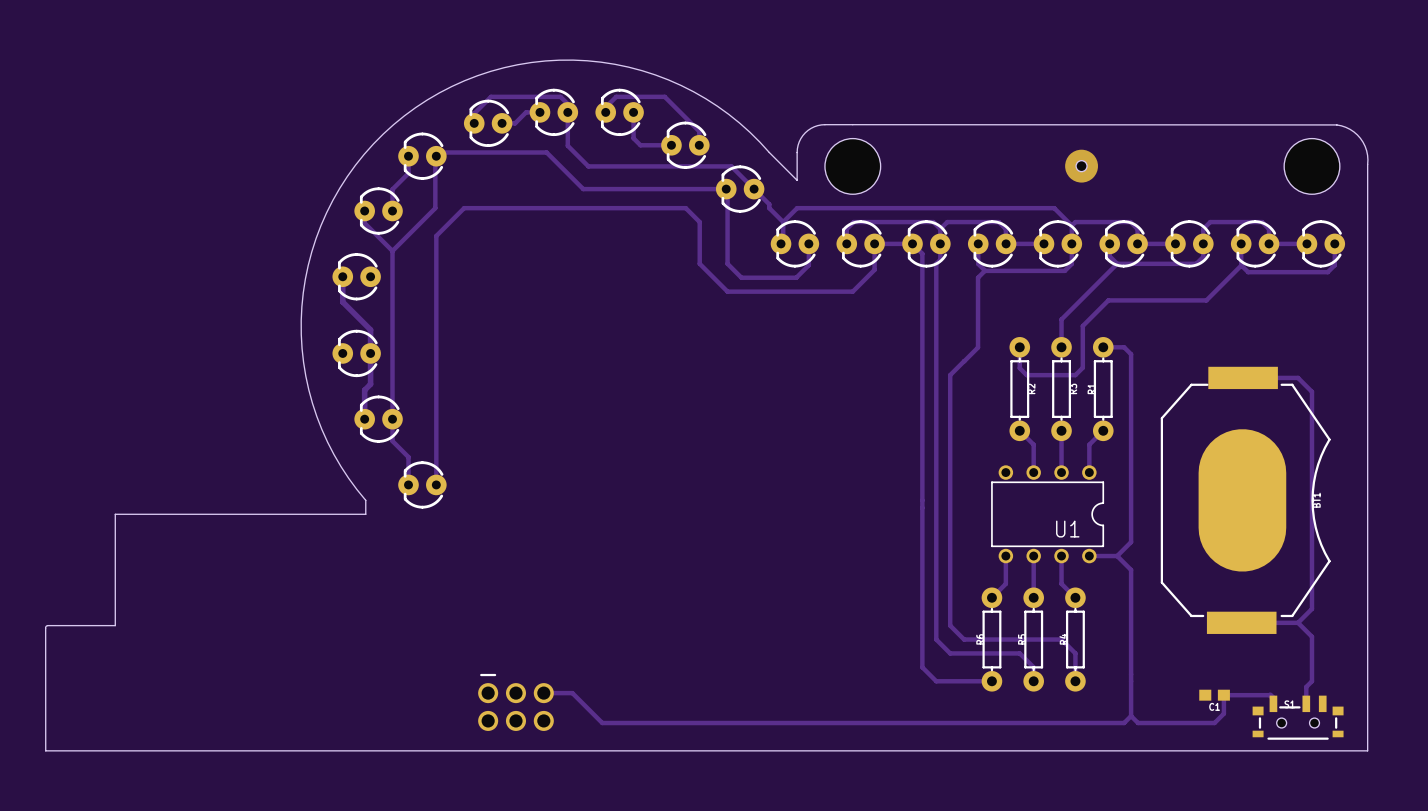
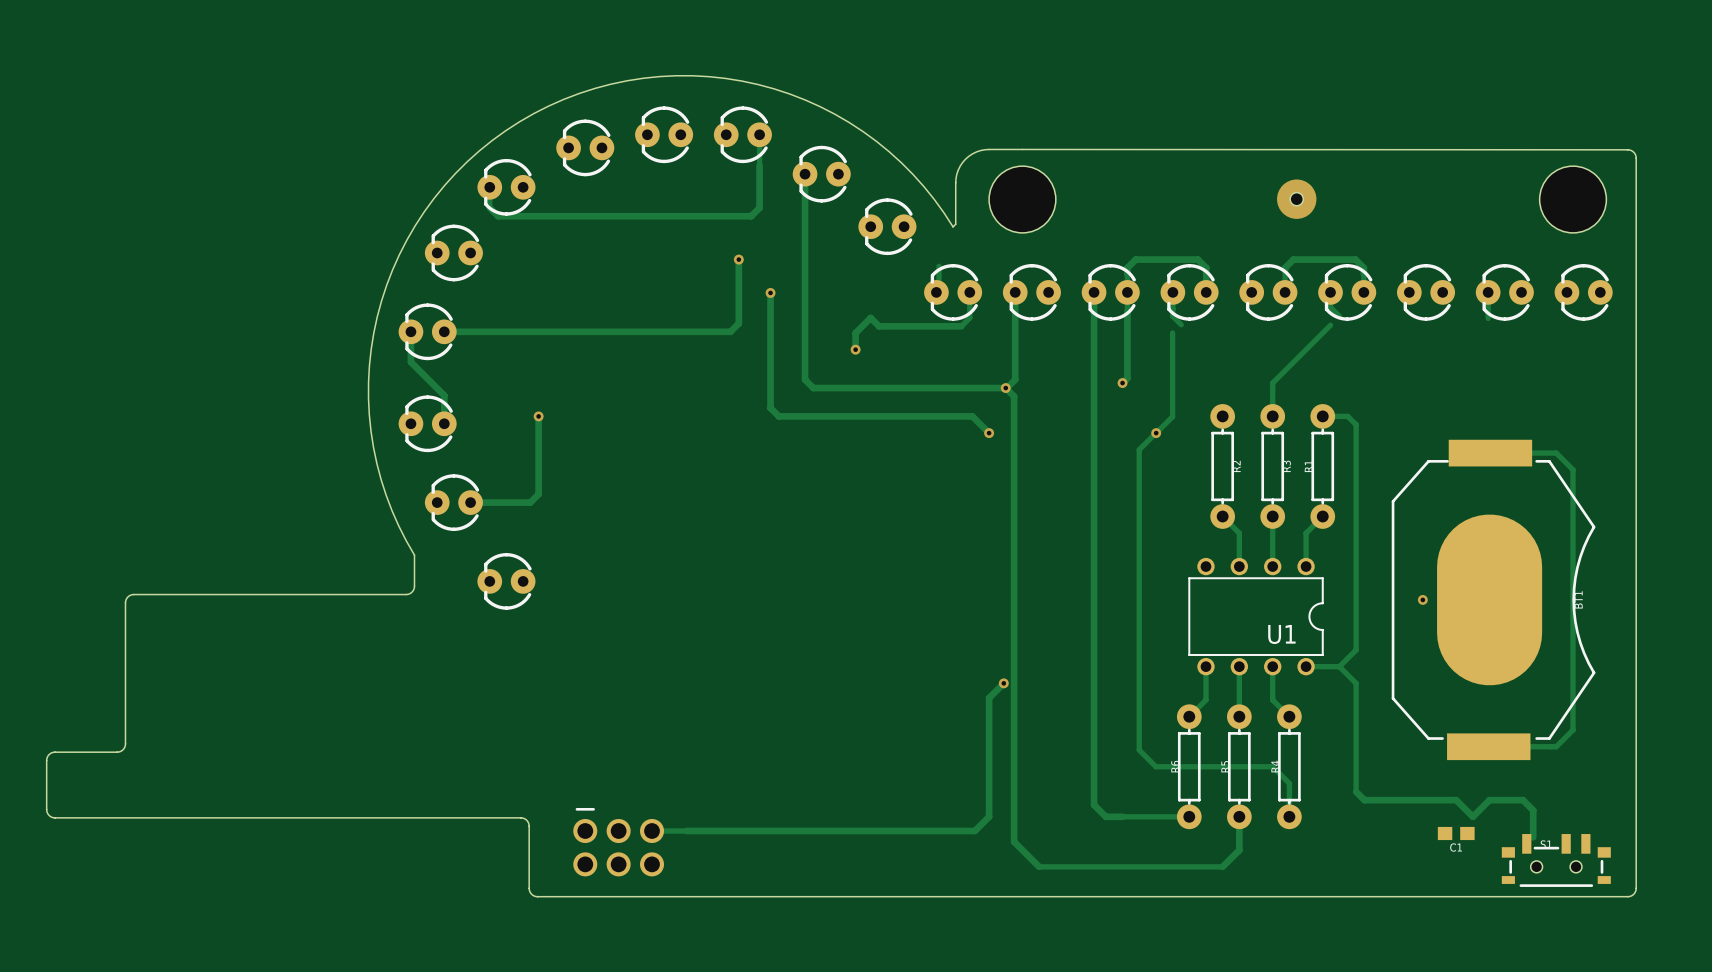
track: (539, 112) (526, 112) (515, 123) (502, 123) -> none
track: (605, 112) (605, 107) (616, 96) (664, 96) (699, 131) (699, 145) -> none
track: (474, 123) (474, 113) (491, 96) (560, 96) (567, 104) (567, 145) (588, 166) (731, 166) (769, 204) (769, 208) (783, 222) (797, 208) (1054, 208) (1071, 225) (1075, 222) (1130, 222) (1137, 229) -> (1285, 270) (1285, 267) (1293, 259) (1355, 259) (1363, 267) (1363, 274)
board edge: (1336, 124) (1345, 127) (1357, 134) (1365, 146) (1367, 159) (1367, 750) (45, 750) (45, 627) (47, 625) (115, 625) (115, 514) (365, 514) (365, 500) (334, 454) (312, 403) (303, 362) (301, 306) (311, 251) (332, 200) (364, 154) (404, 115) (451, 86) (504, 67) (559, 60) (614, 64) (655, 74) (705, 98) (750, 132) (797, 180) -> (1602, 149) (1630, 150) (1634, 153) (1636, 158) (1636, 888) (1631, 896) (537, 896) (532, 894) (529, 889) (529, 825) (526, 820) (521, 817) (55, 817) (47, 813) (46, 760) (49, 753) (55, 752) (118, 752) (124, 747) (125, 602) (129, 595) (406, 594) (412, 591) (414, 555) (398, 526) (386, 495) (376, 463) (371, 431) (368, 382) (373, 332) (381, 300) (392, 269) (415, 225) (434, 198) (455, 173) (479, 150) (505, 130) (533, 113) (563, 99) (610, 84) (643, 78) (676, 75) (709, 76) (741, 81) (774, 88) (805, 99) (849, 122) (876, 141) (901, 162) (934, 199) (953, 226) (955, 224) (955, 216)
track: (633, 138) (640, 145) (671, 145) -> (1015, 292) (1015, 379) (1006, 388) (813, 388) (805, 379) (805, 174)
track: (408, 173) (392, 189) (392, 211) -> (489, 207) (498, 216) (751, 216) (759, 207) (759, 165)
track: (364, 211) (364, 223) (392, 251) -> none
track: none -> (738, 259) (738, 323) (730, 331) (444, 331)
via: none -> (738, 259)
track: none -> (1127, 274) (1127, 267) (1135, 259) (1197, 259) (1206, 267) (1206, 292)
track: (1043, 243) (1006, 243) (1005, 229) (998, 222) (947, 222) (940, 229) (933, 222) (853, 222) (846, 229) (846, 243) -> none
track: (1071, 243) (1071, 263) (1064, 270) (984, 270) (978, 277) -> none
track: (1175, 243) (1137, 243) -> none
track: (1306, 243) (1269, 243) (1269, 229) (1262, 222) (1210, 222) (1203, 229) (1203, 256) (1196, 263) (1117, 263) (1109, 271) -> none
track: (1334, 243) (1334, 265) (1327, 272) (1248, 272) (1241, 265) (1206, 300) (1108, 300) (1082, 326) (1082, 367) (1075, 375) (1026, 375) (1019, 368) (1019, 347) -> none
track: none -> (770, 292) (770, 408) (778, 416) (972, 416) (989, 433)
via: none -> (770, 292)
track: (392, 251) (435, 208) (435, 157) (440, 152) (546, 152) (583, 189) (726, 189) (727, 263) (741, 277) (796, 277) (801, 272) -> (855, 349) (855, 333) (870, 317) (879, 326) (961, 326)
track: (392, 251) (392, 441) (408, 457) (408, 484) -> none
track: (940, 259) (936, 263) (936, 639) (950, 653) (1019, 653) (1033, 667) (1033, 681) -> (1127, 311) (1127, 378) (1122, 383)
via: none -> (855, 349)
via: none -> (1122, 383)
track: none -> (1005, 388) (1014, 396) (1014, 841) (1039, 866)
via: none -> (1005, 388)
track: none -> (538, 416) (538, 494) (530, 502) (470, 502)
via: none -> (538, 416)
track: (370, 353) (370, 384) (364, 390) (364, 419) -> none
via: none -> (989, 433)
via: none -> (1156, 433)
track: (436, 484) (436, 235) (464, 208) (685, 208) (699, 222) (699, 263) (727, 291) (852, 291) (874, 269) (874, 243) (912, 243) (922, 253) (922, 667) (936, 681) -> (1094, 292) (1094, 804) (1105, 816) (1122, 816)
via: none -> (1422, 599)
via: none -> (1003, 683)
track: (1298, 622) (1311, 636) (1311, 681) (1306, 686) (1306, 703) -> none
track: (1131, 660) (1131, 716) -> (1356, 791) (1364, 800) (1456, 800) (1472, 816) (1489, 800) (1522, 800) (1533, 810) (1533, 837)
track: (572, 693) (602, 723) (866, 723) -> (686, 831) (974, 831) (989, 816) (989, 698) (1003, 683)
track: (1273, 703) (1273, 698) (1270, 695) (1223, 695) (1223, 713) (1214, 723) (1138, 723) (1131, 716) -> none
track: (1131, 716) (1124, 723) (1019, 723) -> (1239, 816) (1239, 850) (1222, 866)

